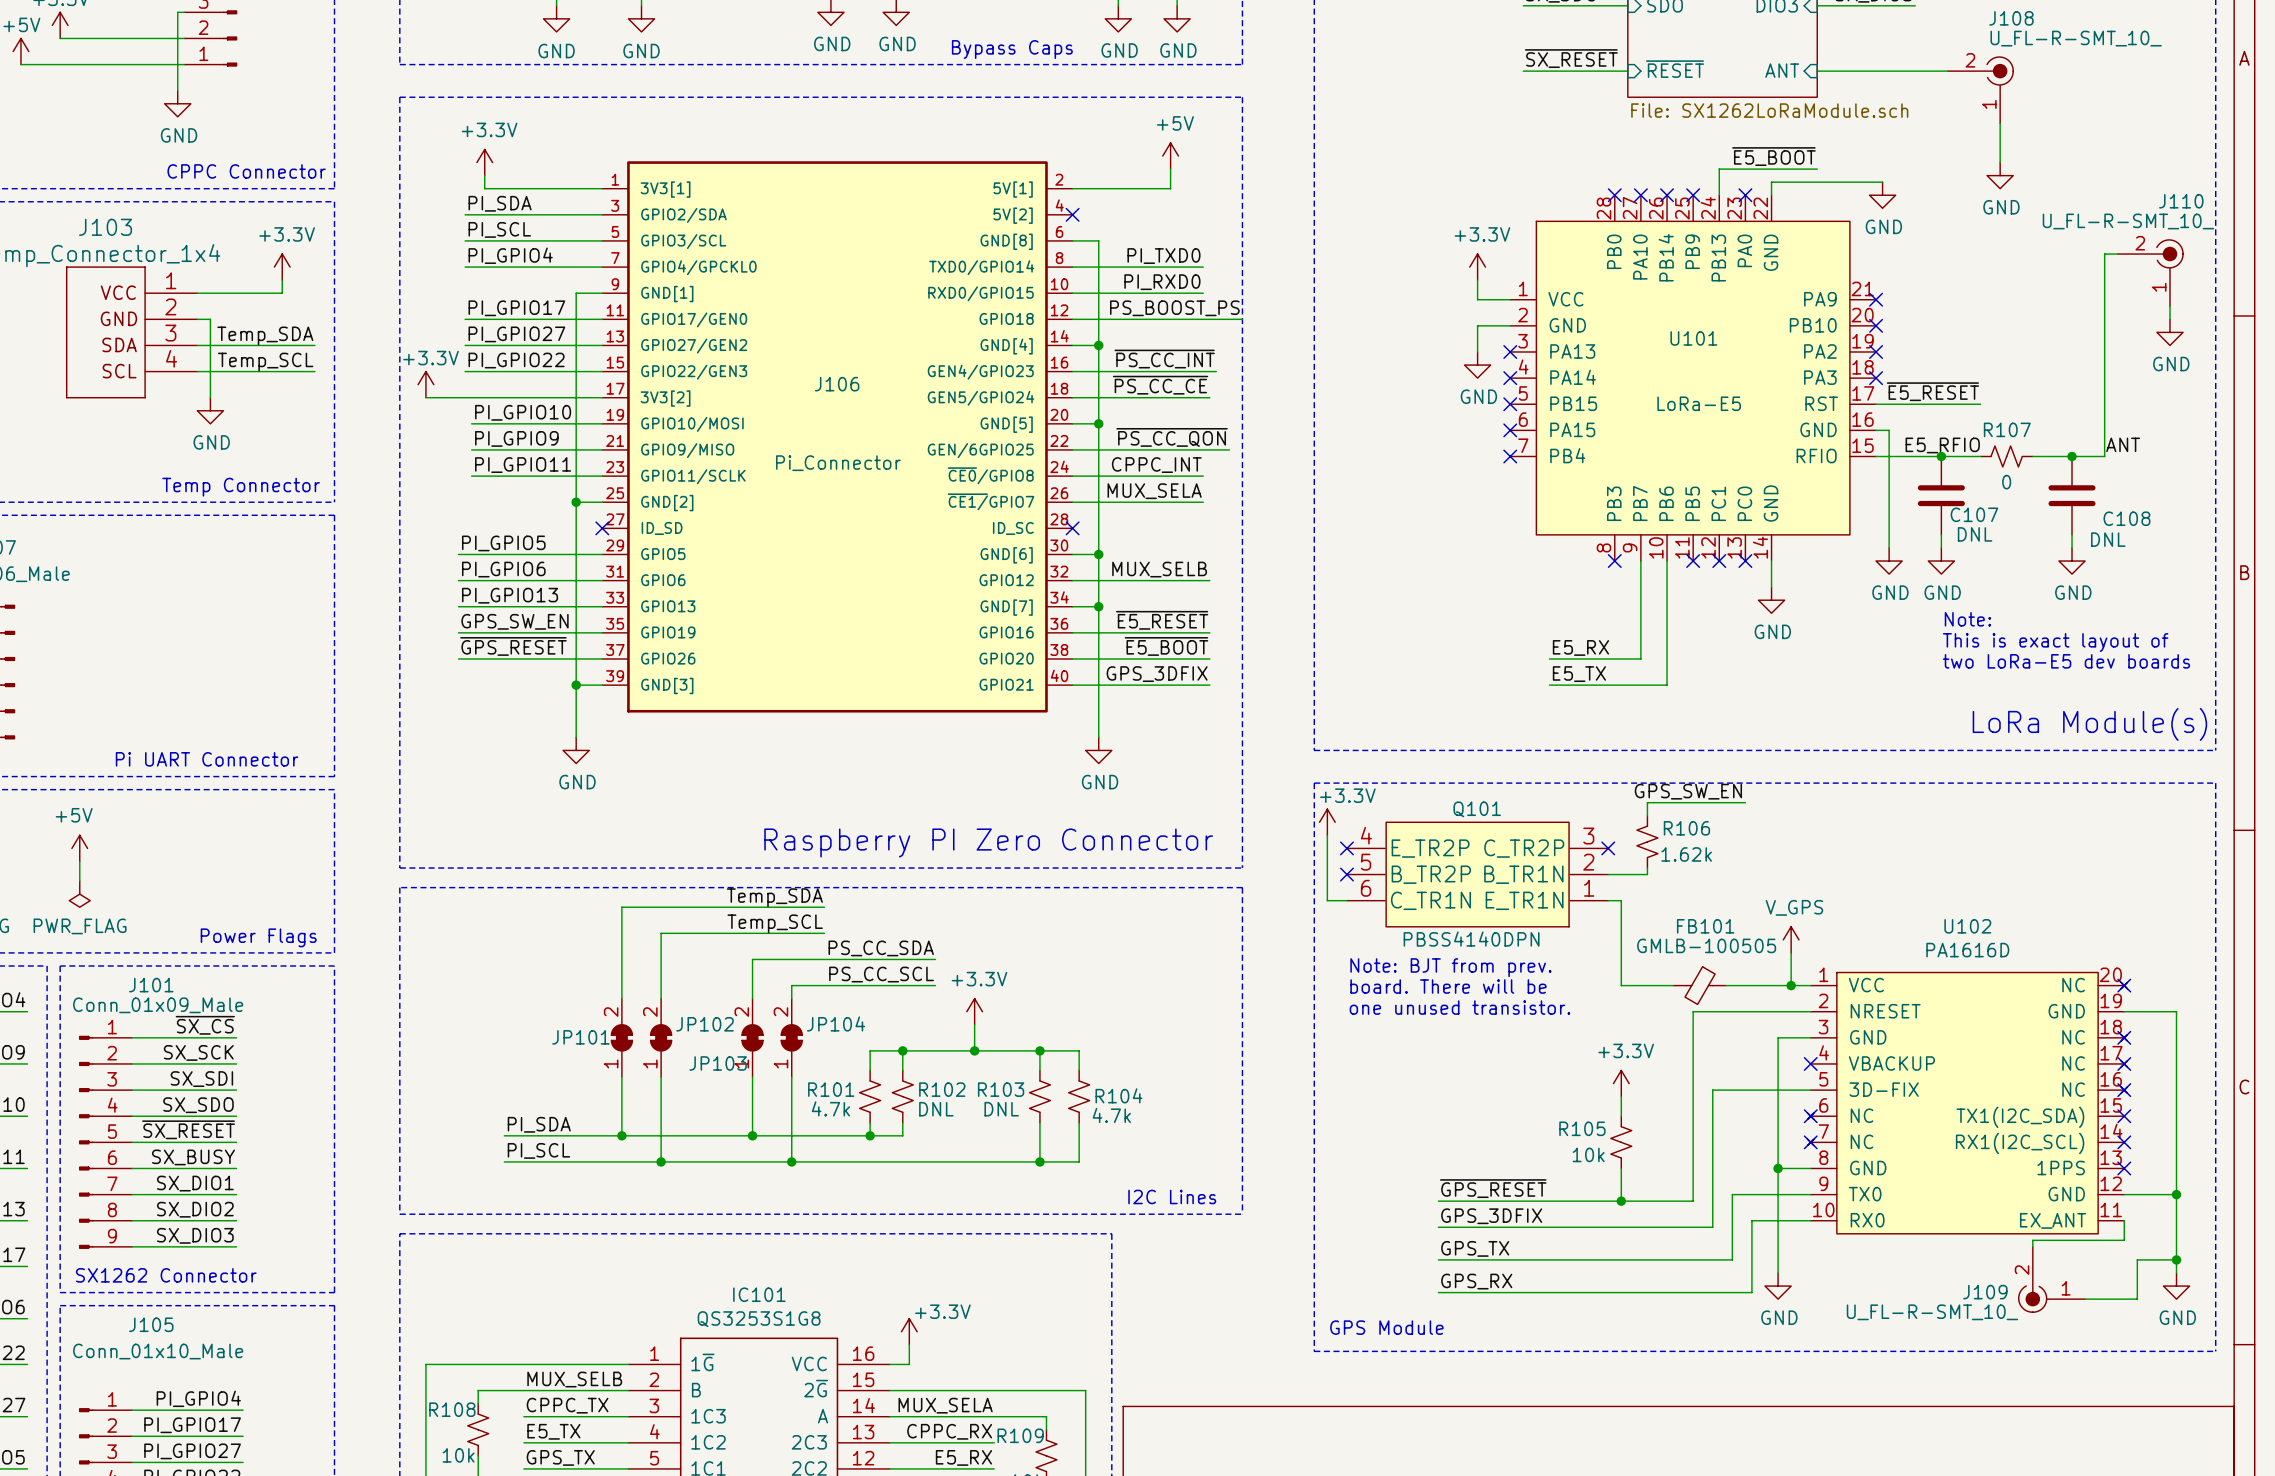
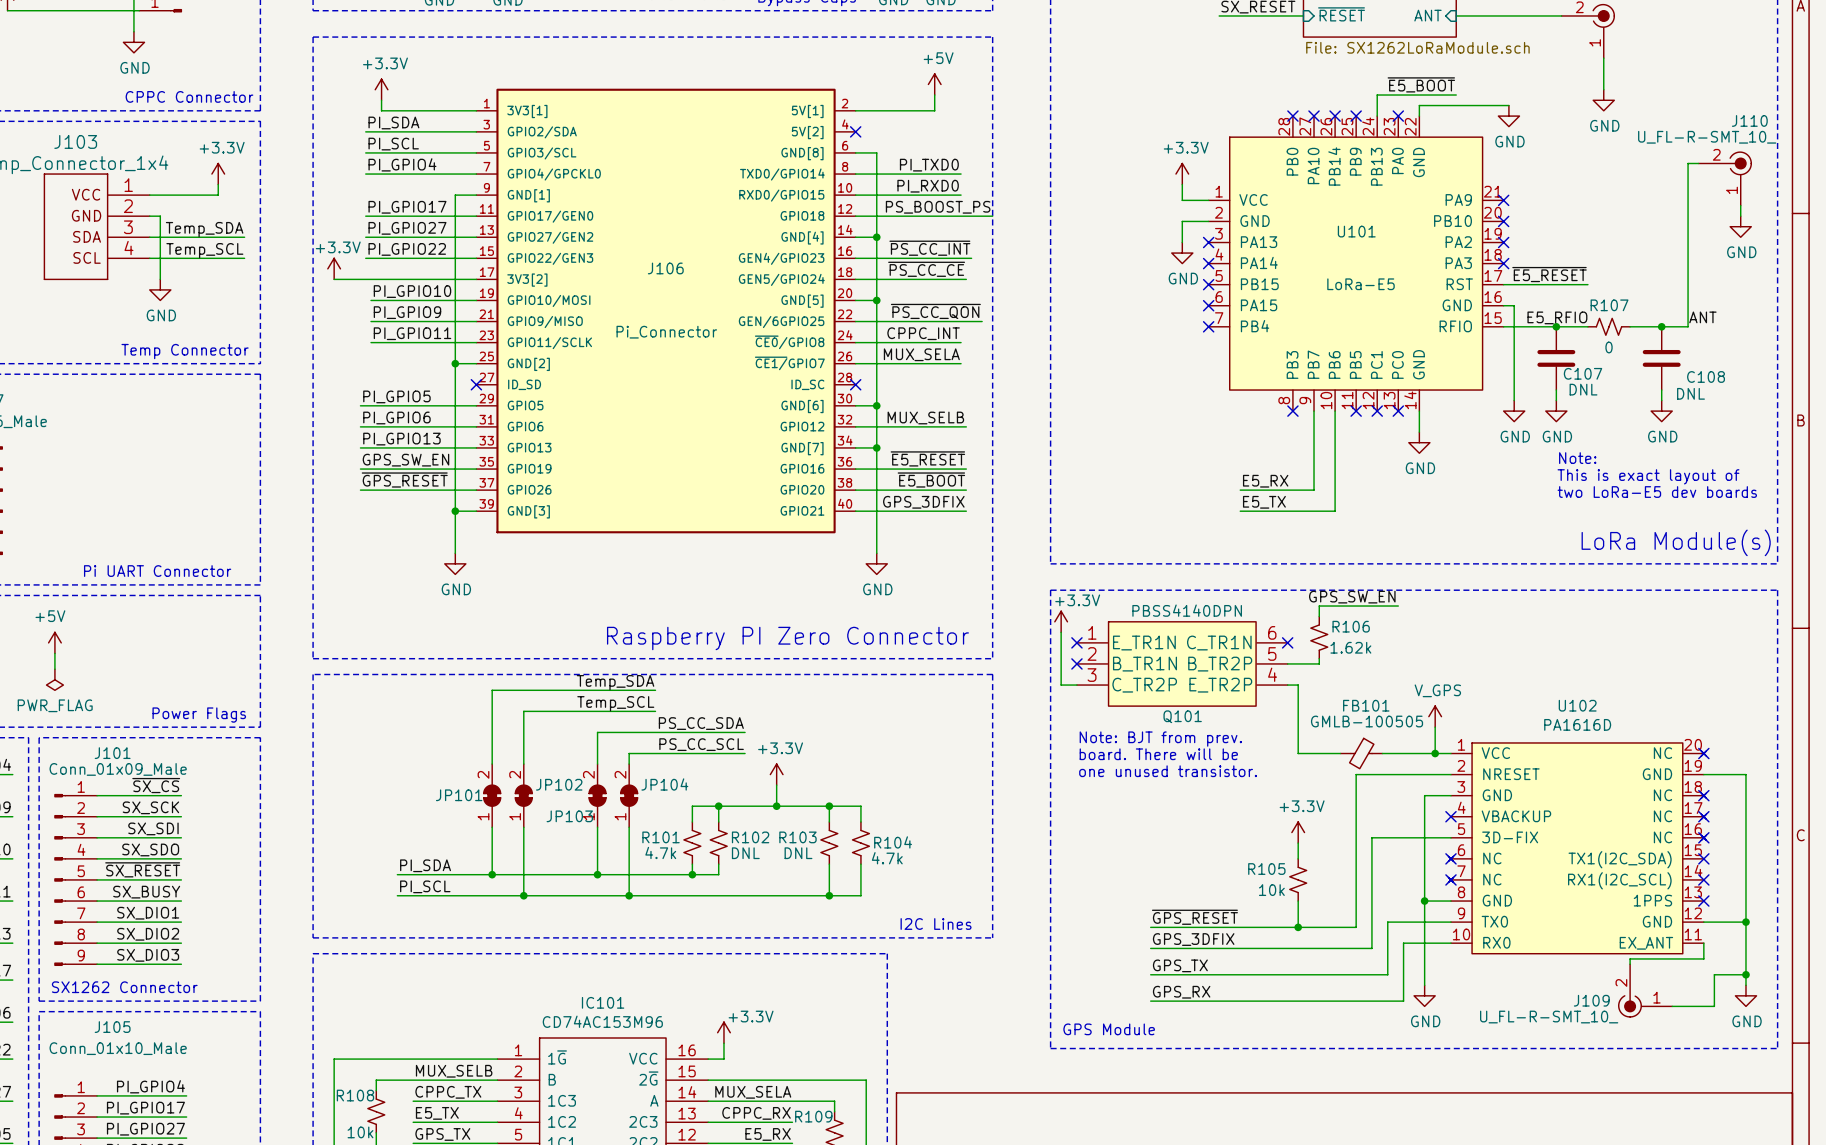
Q101 rotation: 0° (1477, 874) -> 180° (1182, 663)
IC101 value: QS3253S1G8 (759, 1319) -> CD74AC153M96 (602, 1021)

